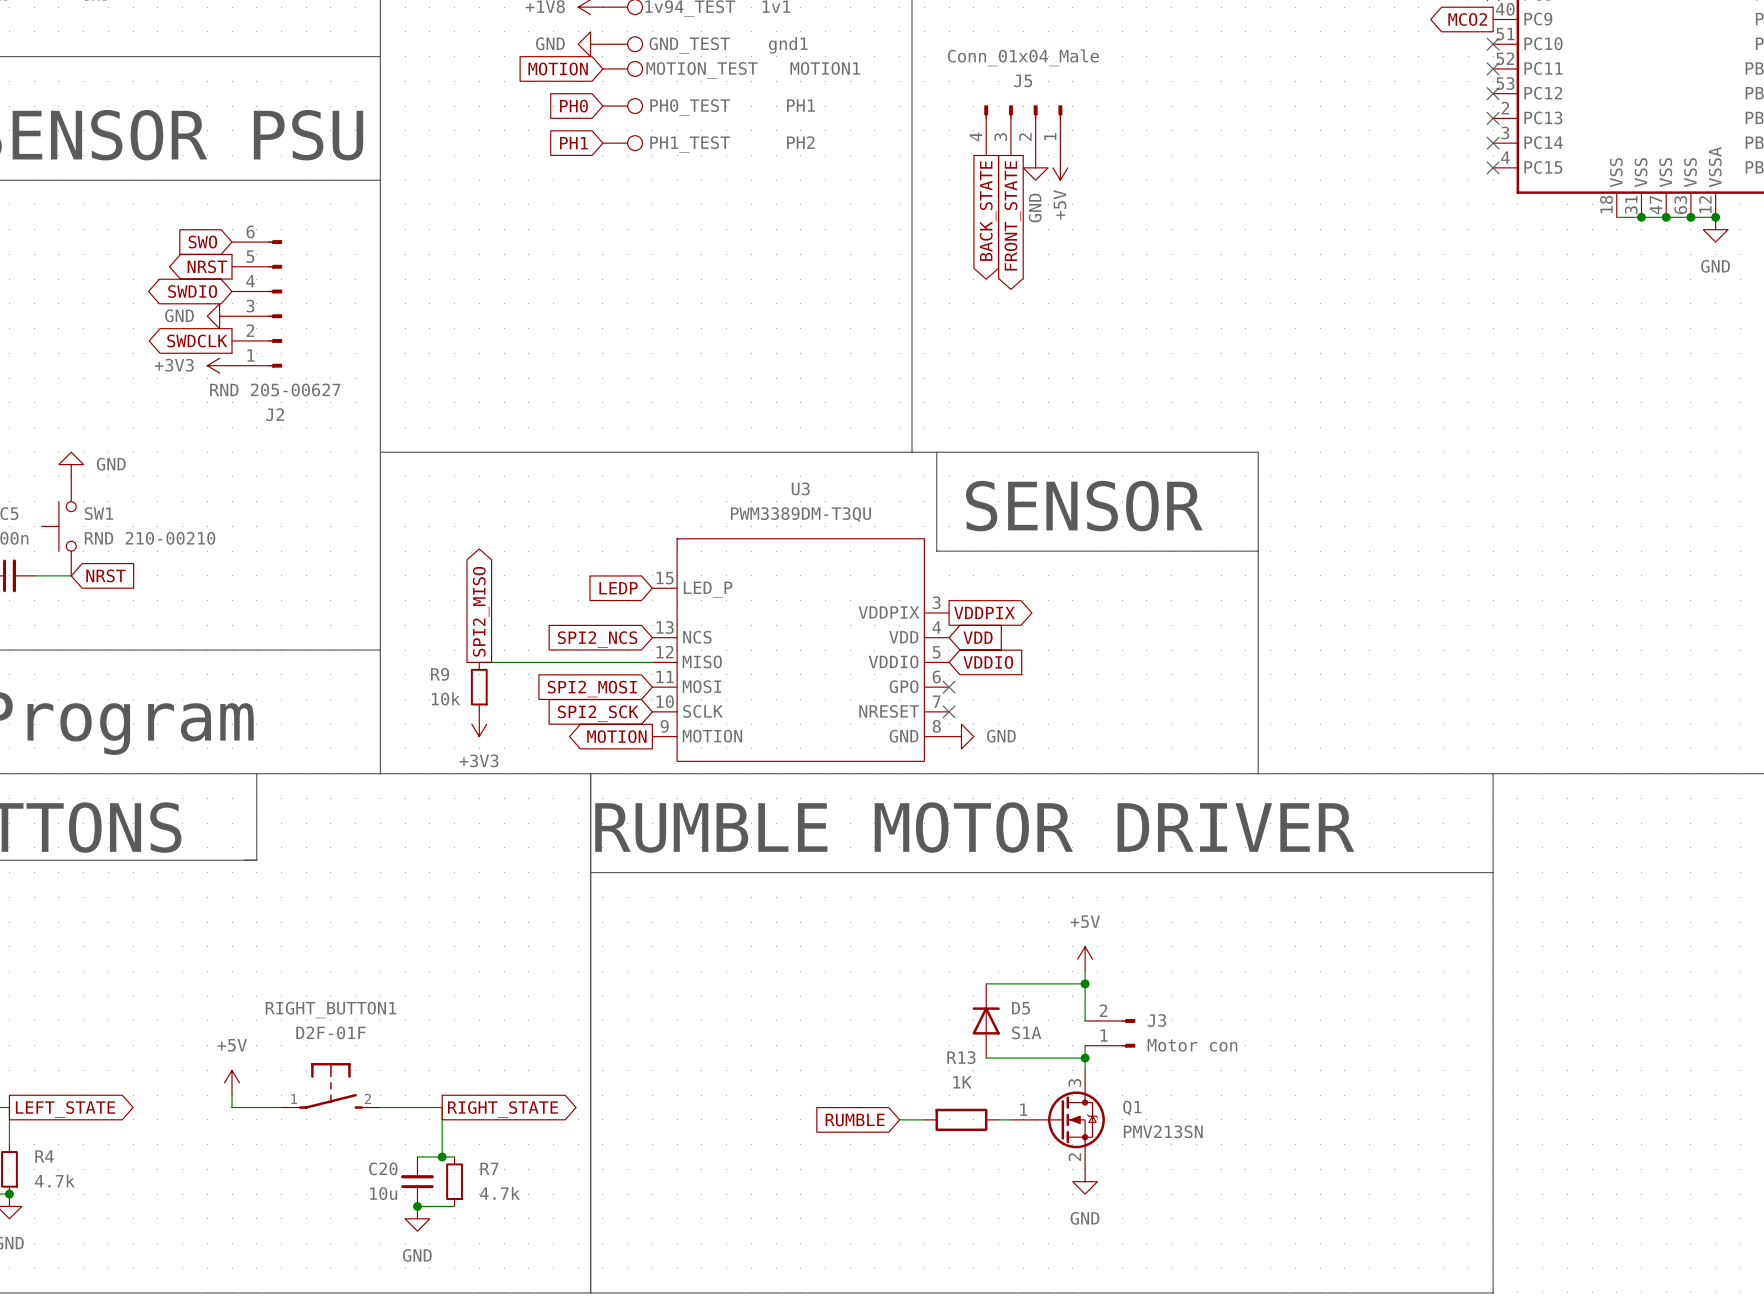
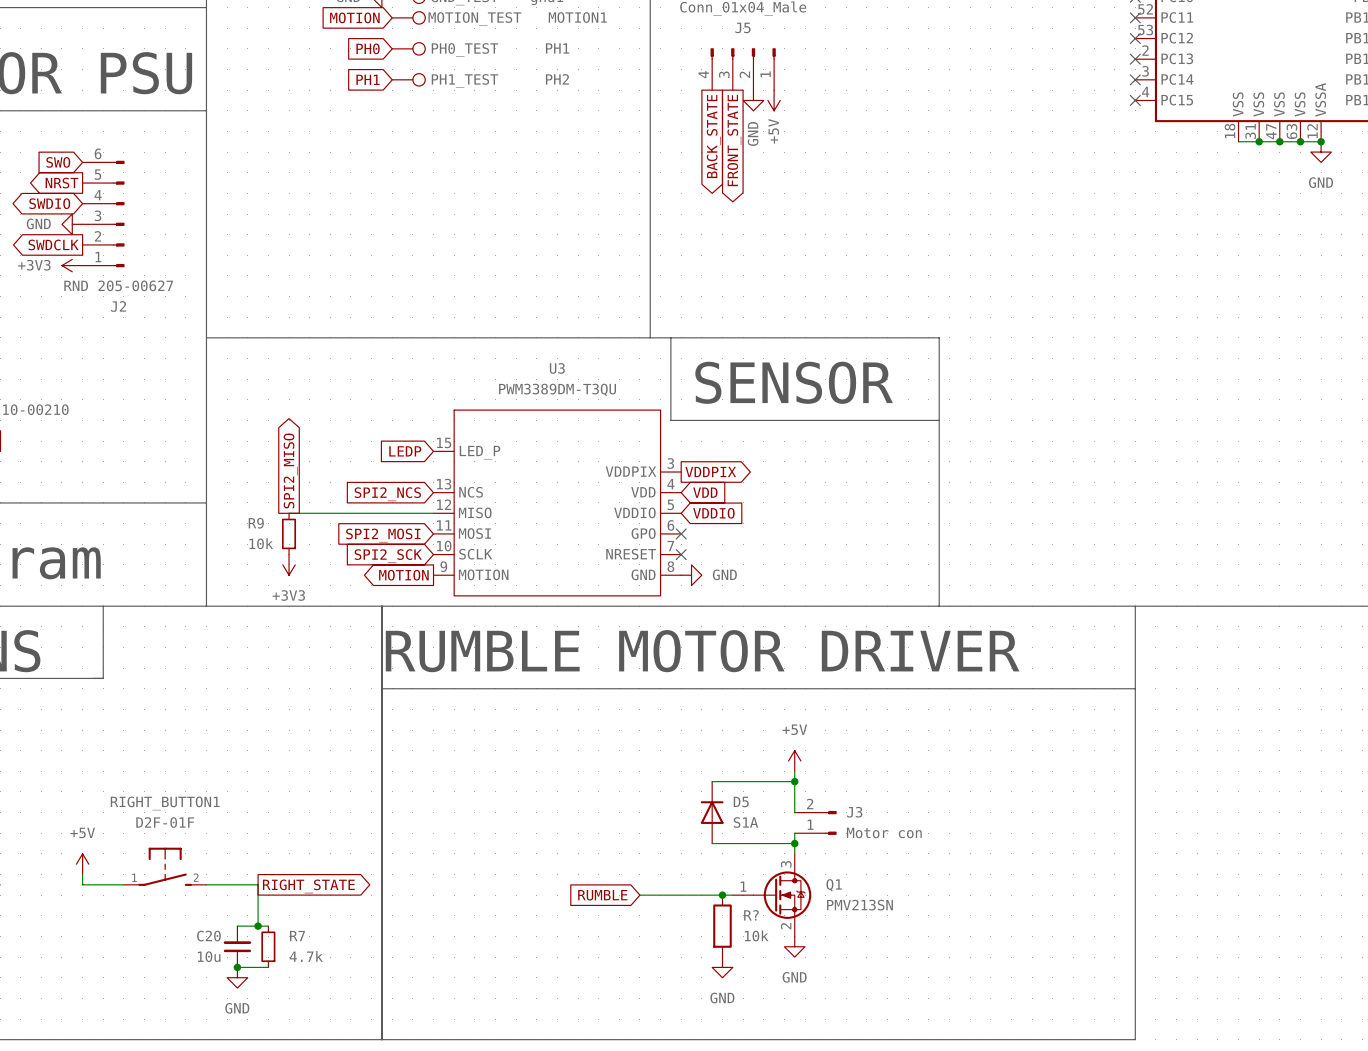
wire: none -> (660, 895) (722, 895)
R13: 1K (961, 1119) -> none
junction: none -> (722, 895)
R?: none -> 10k (722, 926)
power symbol: none -> GND (722, 967)

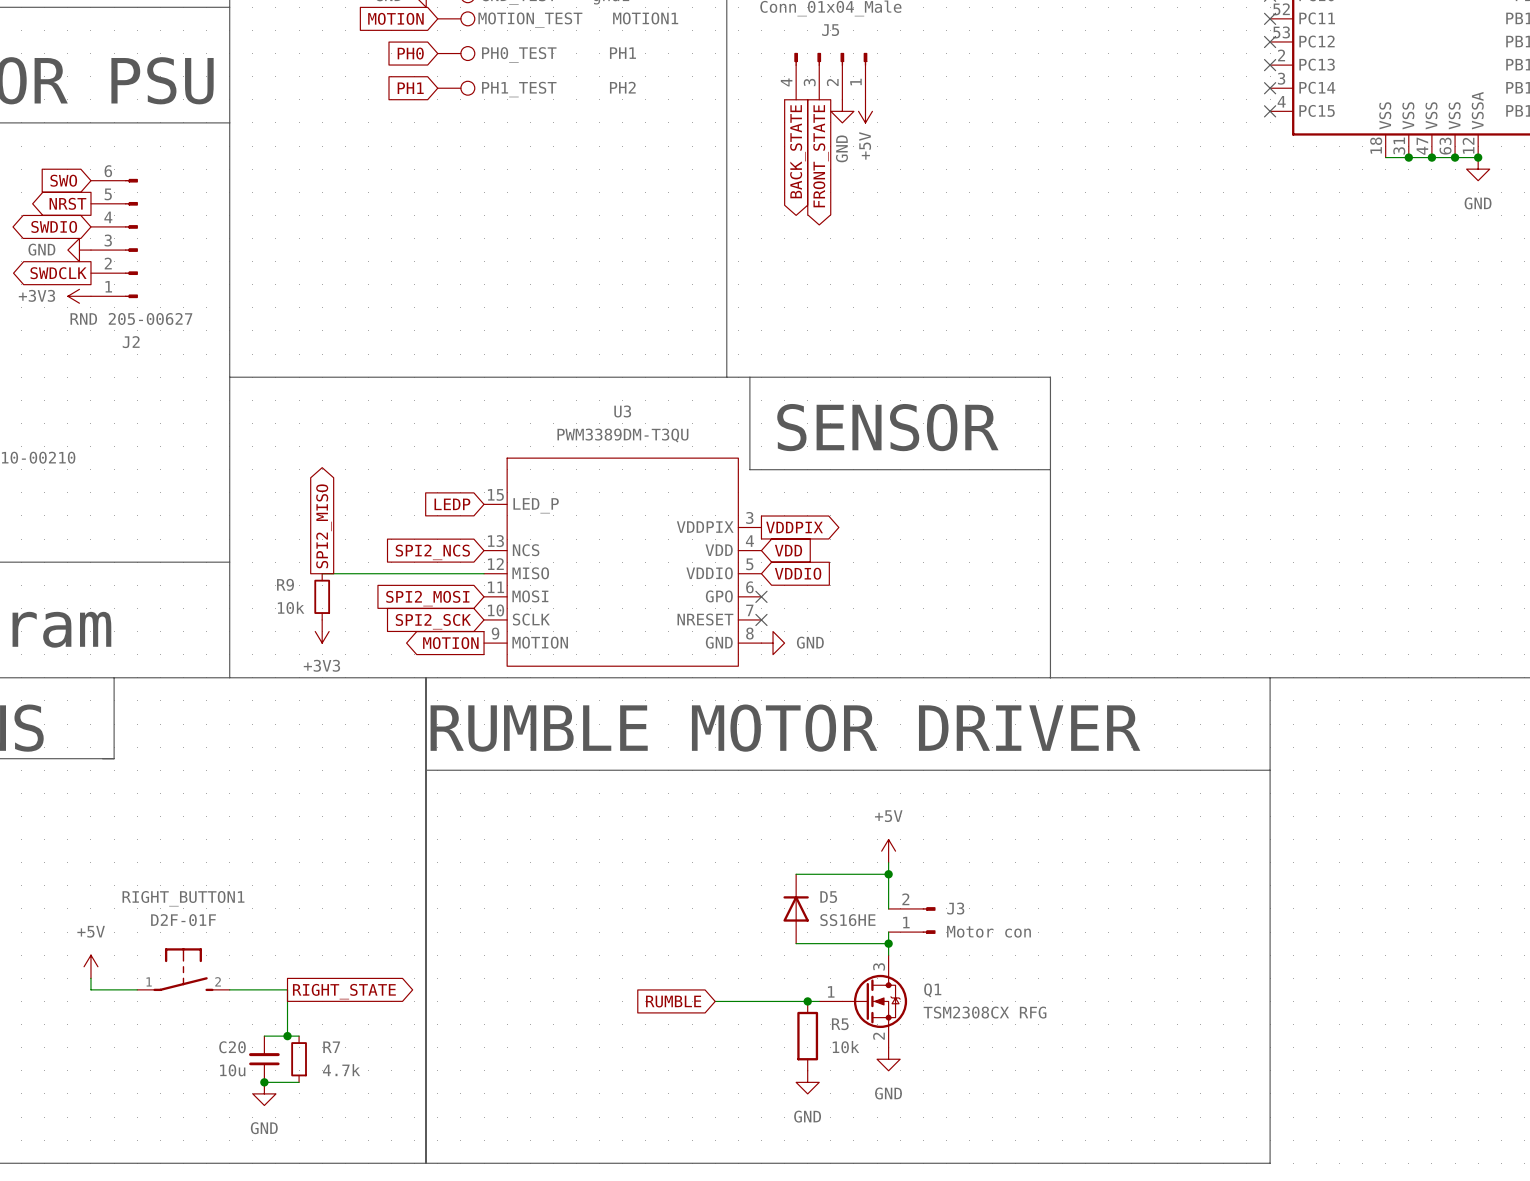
D5 value: S1A (745, 822) -> SS16HE (847, 920)
Q1 value: PMV213SN (859, 905) -> TSM2308CX RFG (985, 1012)
R? name: R? (751, 915) -> R5 (840, 1024)

